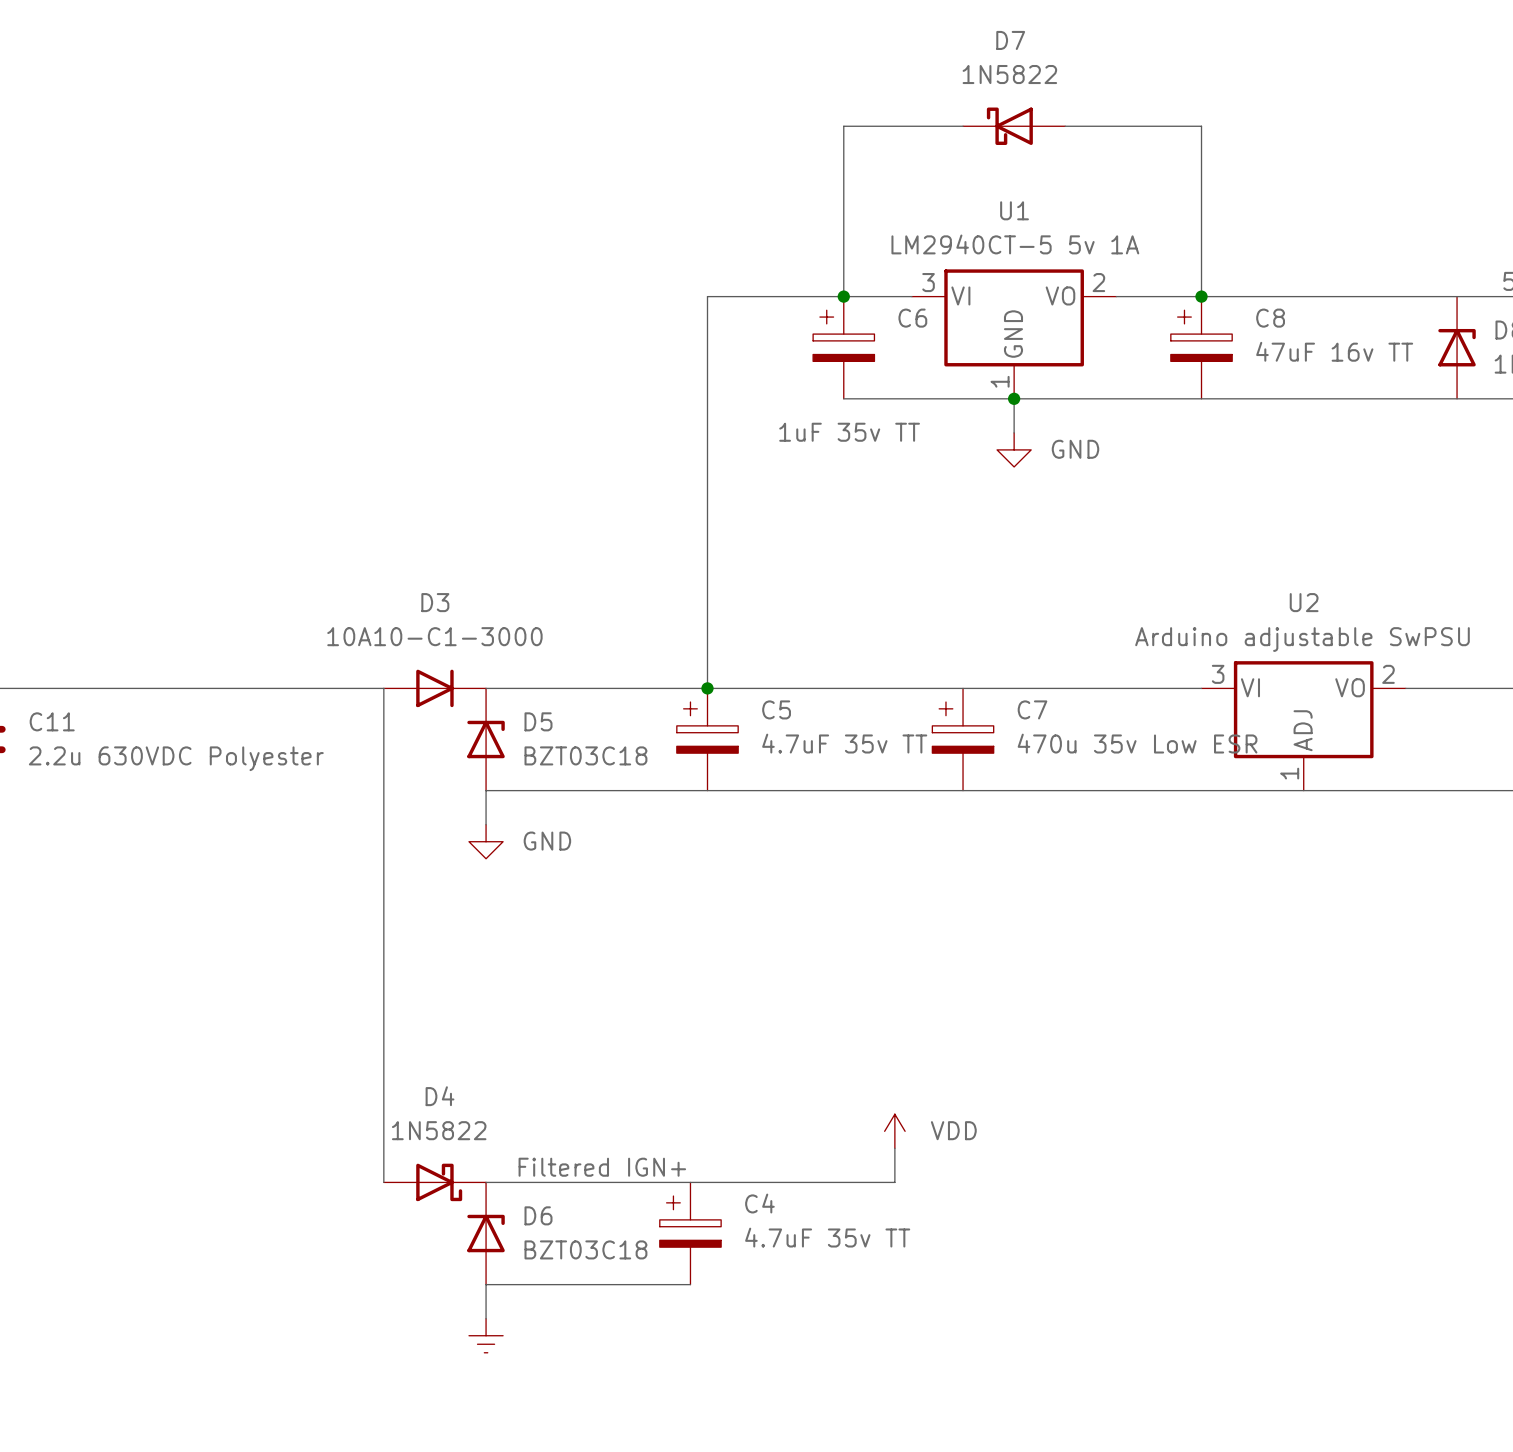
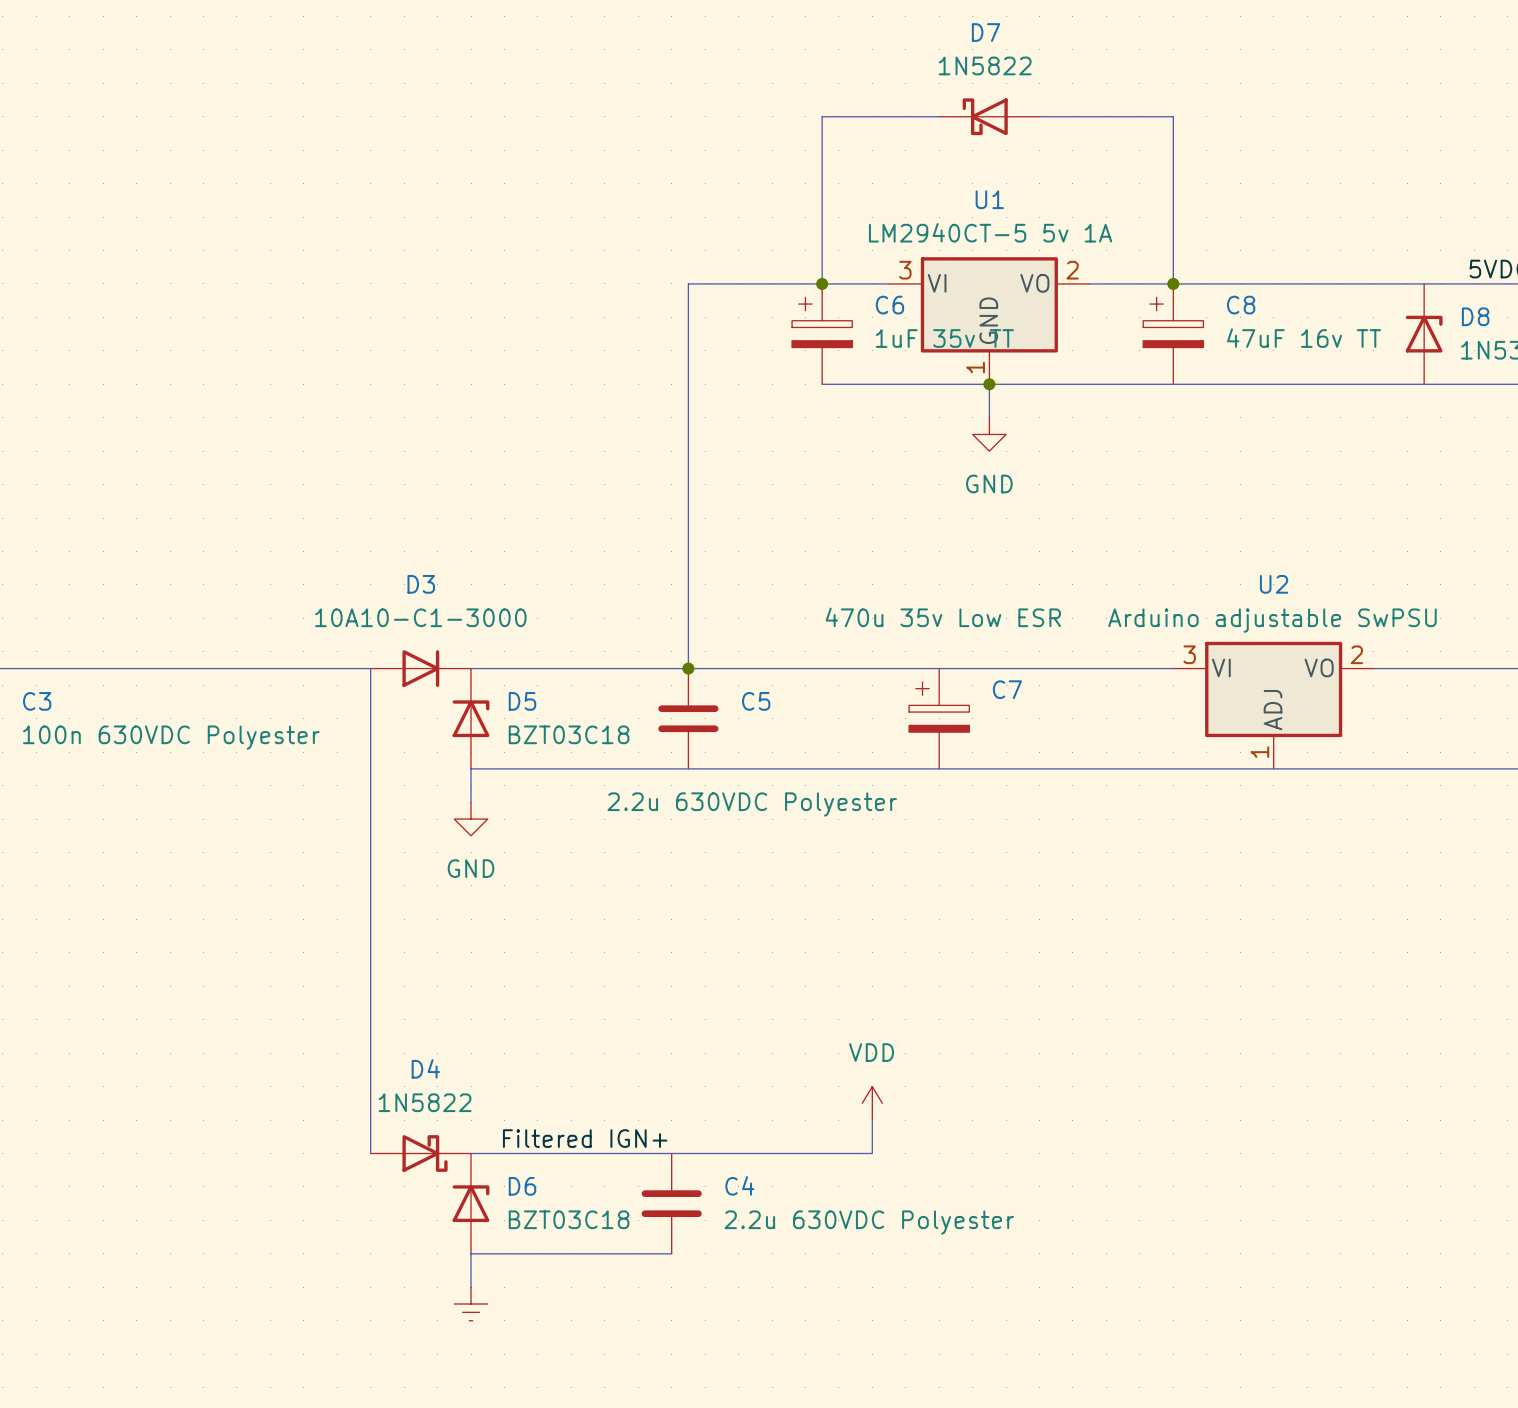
C6 value position: 1uF 35v TT (849, 432) -> 1uF 35v TT (944, 338)
power symbol text position: GND (1075, 449) -> GND (989, 484)
C5 symbol: [676, 688, 739, 791] -> [658, 668, 719, 769]
C11 name: C11 (52, 721) -> C3 (37, 701)
C5 value: 4.7uF 35v TT (844, 743) -> 2.2u 630VDC Polyester (752, 804)
C7 value position: 470u 35v Low ESR (1137, 743) -> 470u 35v Low ESR (943, 617)
C11 value: 2.2u 630VDC Polyester (176, 758) -> 100n 630VDC Polyester (171, 737)
power symbol text position: GND (547, 841) -> GND (471, 868)
power symbol text position: VDD (953, 1130) -> VDD (871, 1052)
C4 symbol: [659, 1182, 722, 1285] -> [641, 1153, 702, 1254]
C4 value: 4.7uF 35v TT (827, 1237) -> 2.2u 630VDC Polyester (869, 1222)

